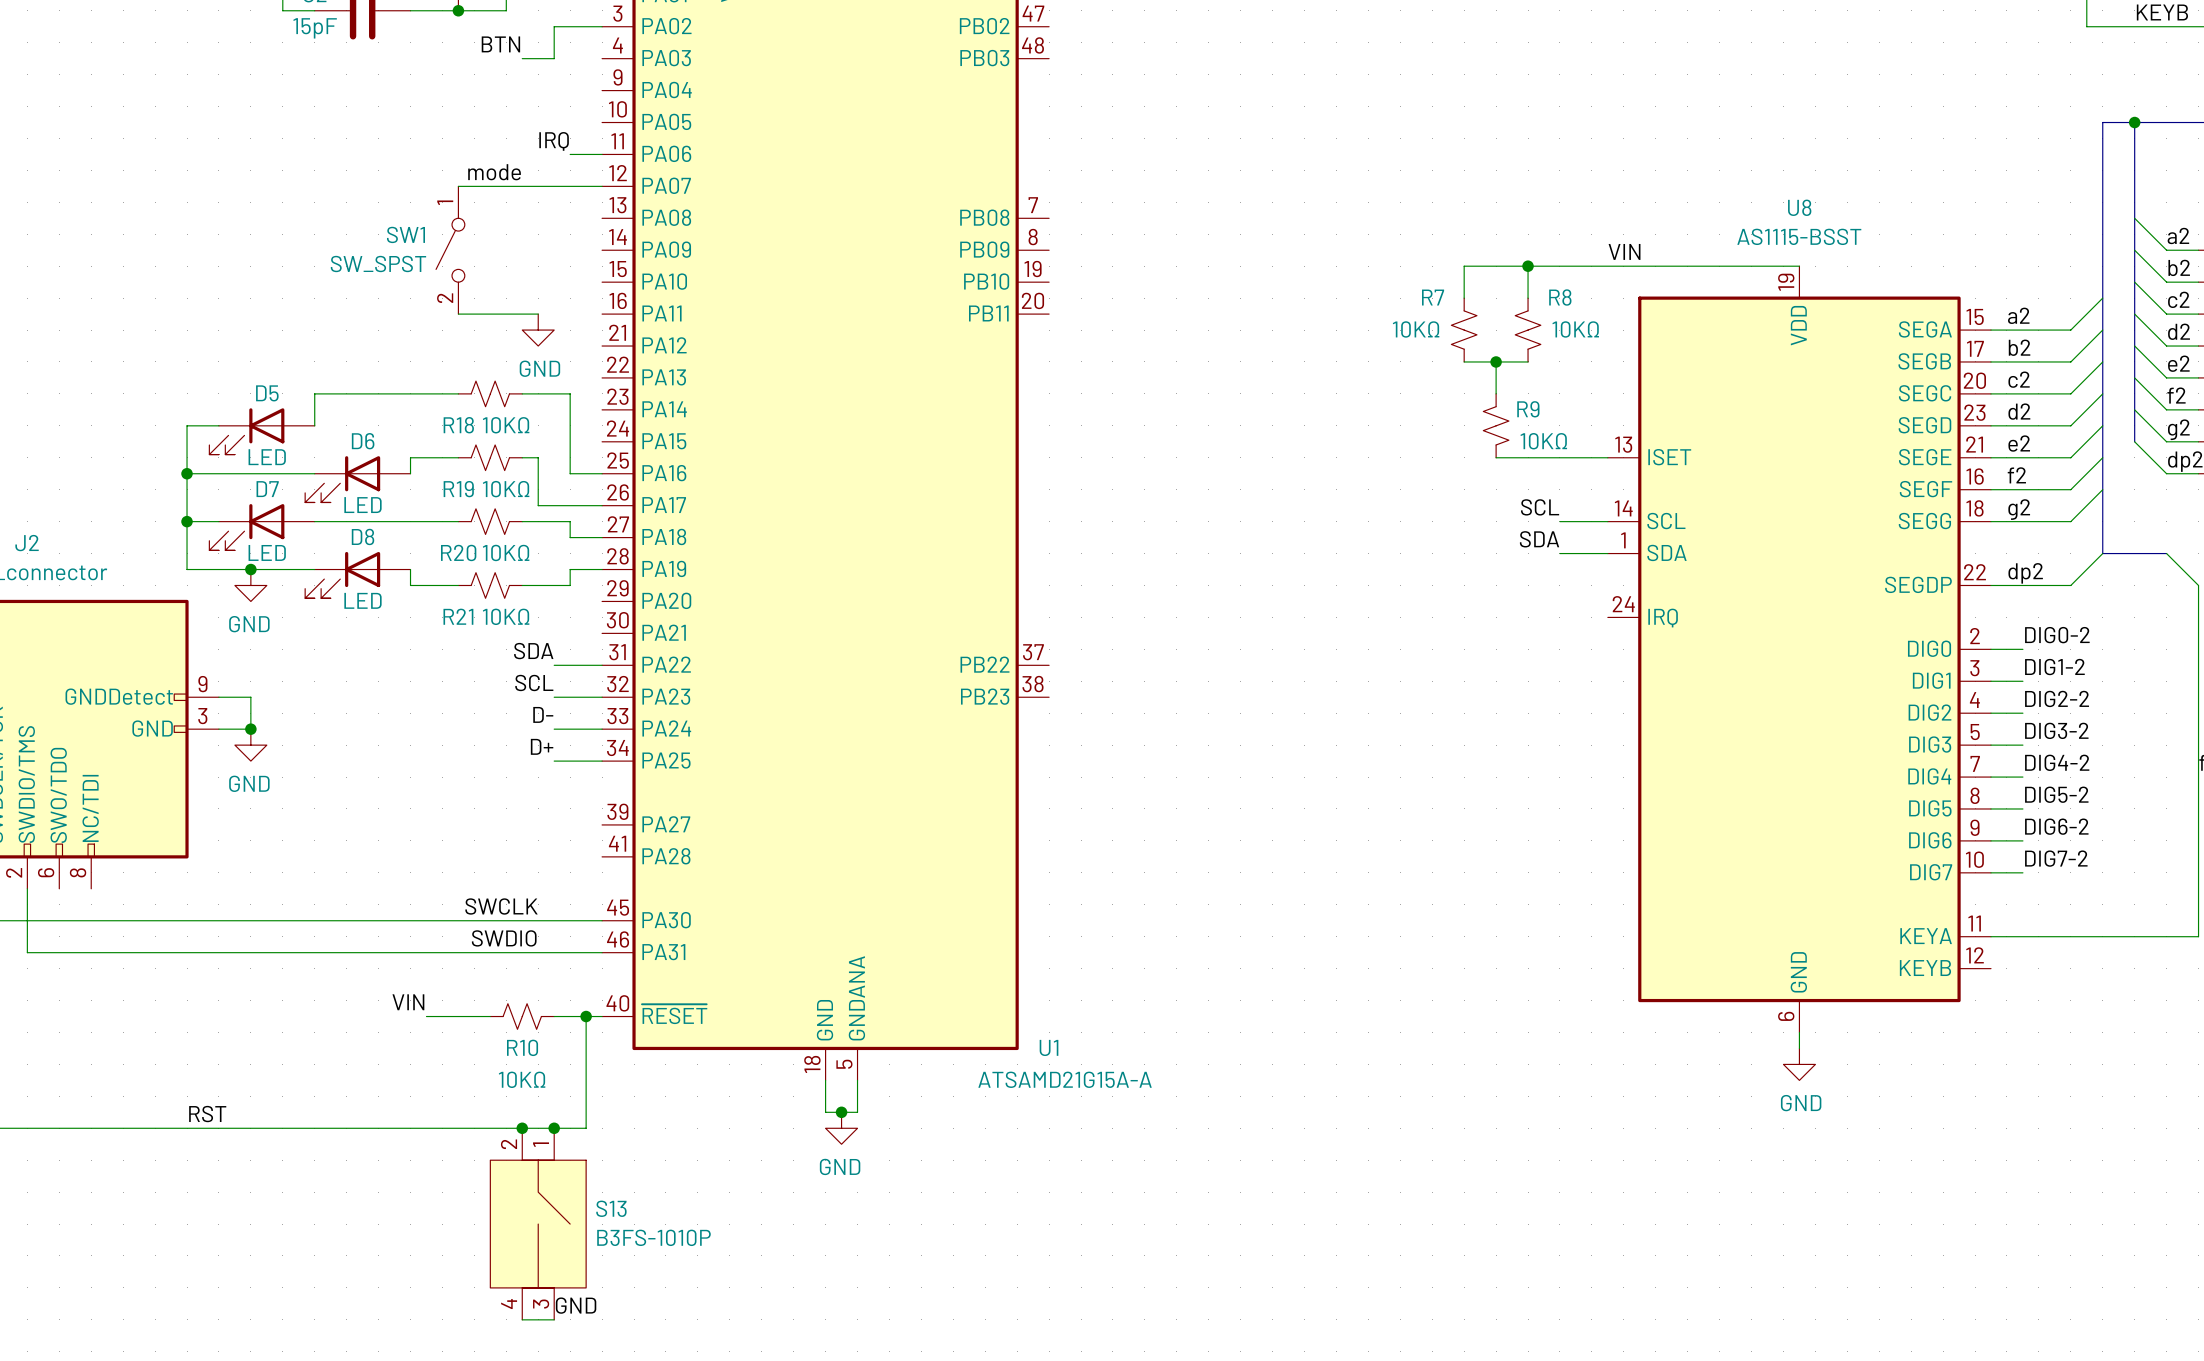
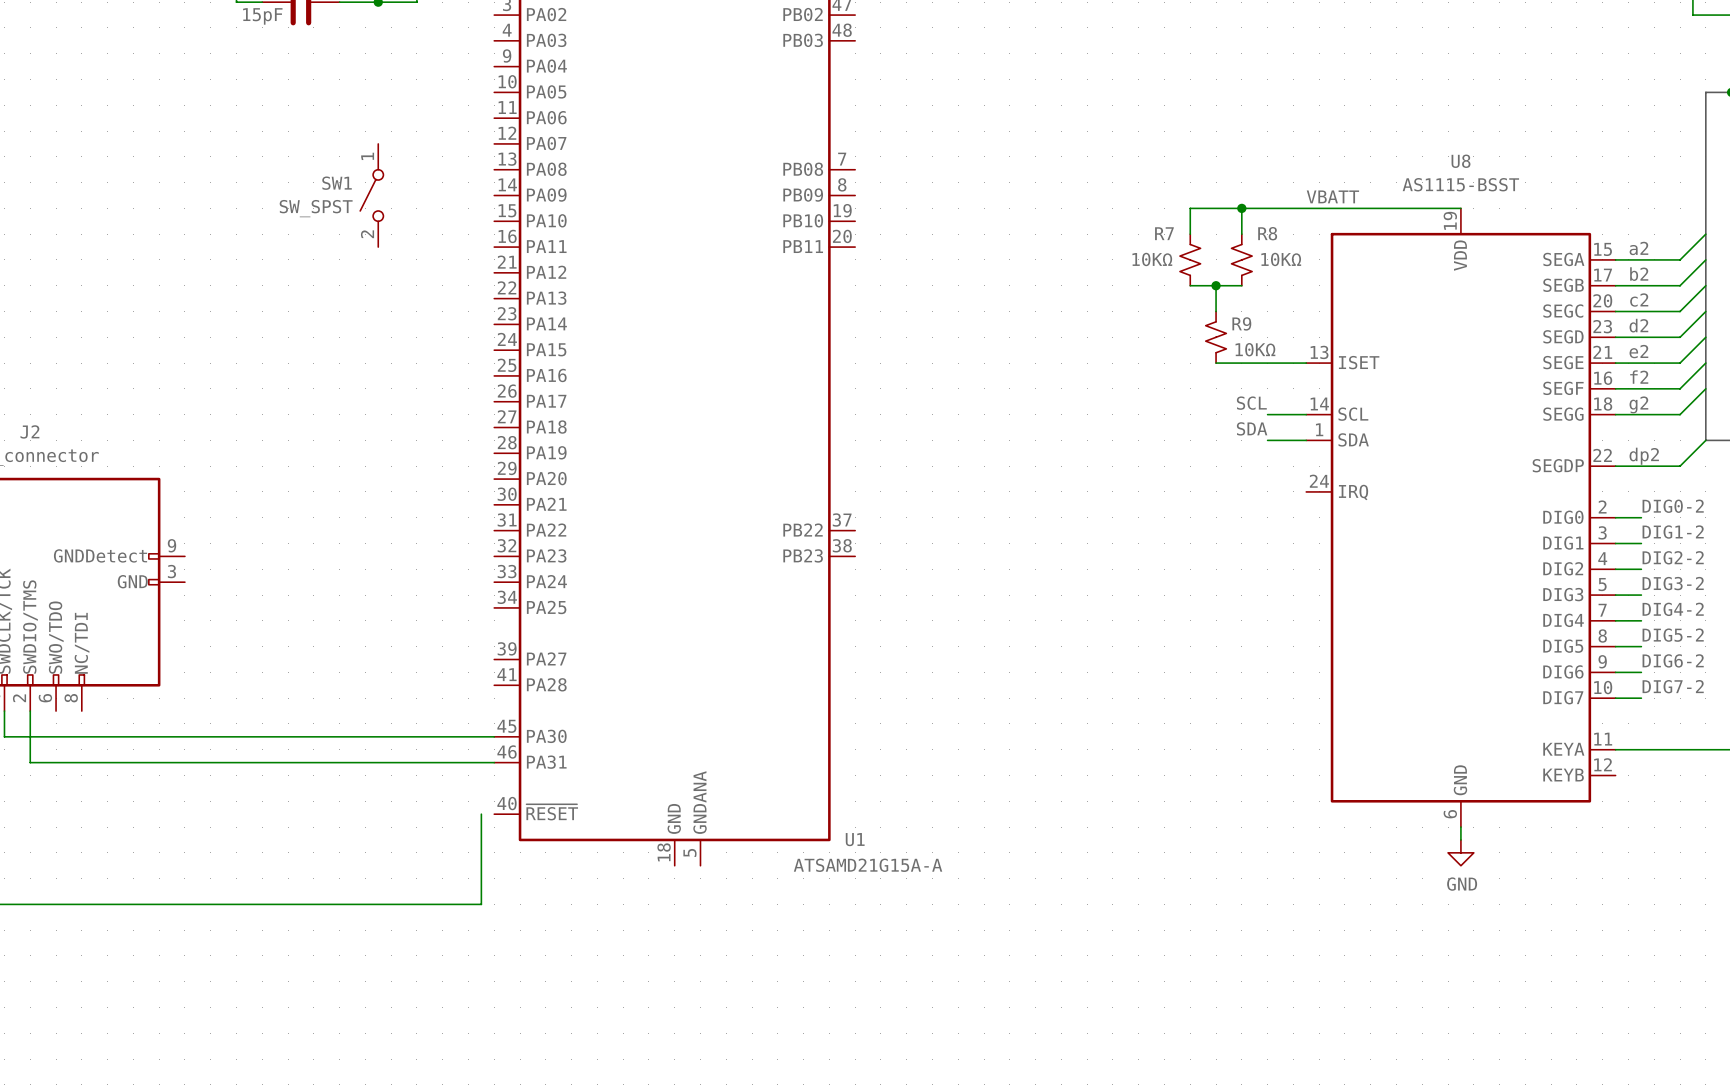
wire: (602, 26) (554, 26) (554, 58) (522, 58) -> none
label: BTN (500, 44) -> none
label: IRQ (554, 141) -> none
wire: (570, 154) (602, 154) -> none
label: mode (494, 172) -> none
wire: (458, 186) (602, 186) -> none
label: VIN (1624, 251) -> VBATT (1332, 196)
wire: (458, 314) (538, 314) -> none
power symbol: GND (538, 330) -> none
wire: (458, 393) (314, 393) (314, 425) -> none
R18: 10KΩ (490, 393) -> none
wire: (522, 393) (570, 393) (570, 473) (602, 473) -> none
wire: (218, 425) (187, 425) (187, 569) (314, 569) -> none
D5: LED (262, 431) -> none
wire: (458, 457) (410, 457) (410, 473) -> none
R19: 10KΩ (490, 457) -> none
wire: (522, 457) (538, 457) (538, 505) (602, 505) -> none
wire: (187, 473) (314, 473) -> none
junction: (187, 473) -> none
D6: LED (357, 479) -> none
wire: (187, 521) (218, 521) -> none
junction: (187, 521) -> none
wire: (314, 521) (458, 521) -> none
R20: 10KΩ (490, 521) -> none
wire: (522, 521) (570, 521) (570, 537) (602, 537) -> none
D7: LED (262, 527) -> none
junction: (250, 569) -> none
wire: (410, 569) (410, 585) (458, 585) -> none
wire: (602, 569) (570, 569) (570, 585) (522, 585) -> none
D8: LED (357, 575) -> none
power symbol: GND (250, 585) -> none
R21: 10KΩ (490, 585) -> none
label: SDA (533, 651) -> none
wire: (554, 665) (602, 665) -> none
label: SCL (534, 683) -> none
wire: (218, 697) (250, 697) (250, 729) (218, 729) -> none
wire: (554, 697) (602, 697) -> none
label: D- (543, 714) -> none
junction: (250, 729) -> none
wire: (554, 729) (602, 729) -> none
power symbol: GND (250, 745) -> none
label: D+ (542, 746) -> none
wire: (554, 761) (602, 761) -> none
label: SWCLK (501, 906) -> none
label: SWDIO (504, 938) -> none
label: VIN (408, 1002) -> none
wire: (426, 1016) (490, 1016) -> none
R10: 10KΩ (522, 1016) -> none
wire: (554, 1016) (602, 1016) -> none
junction: (586, 1016) -> none
wire: (825, 1080) (825, 1112) (857, 1112) (857, 1080) -> none
junction: (841, 1112) -> none
label: RST (207, 1114) -> none
junction: (522, 1128) -> none
junction: (554, 1128) -> none
power symbol: GND (841, 1128) -> none
S13: B3FS-1010P (538, 1224) -> none
label: GND (576, 1305) -> none
wire: (522, 1319) (554, 1319) -> none

